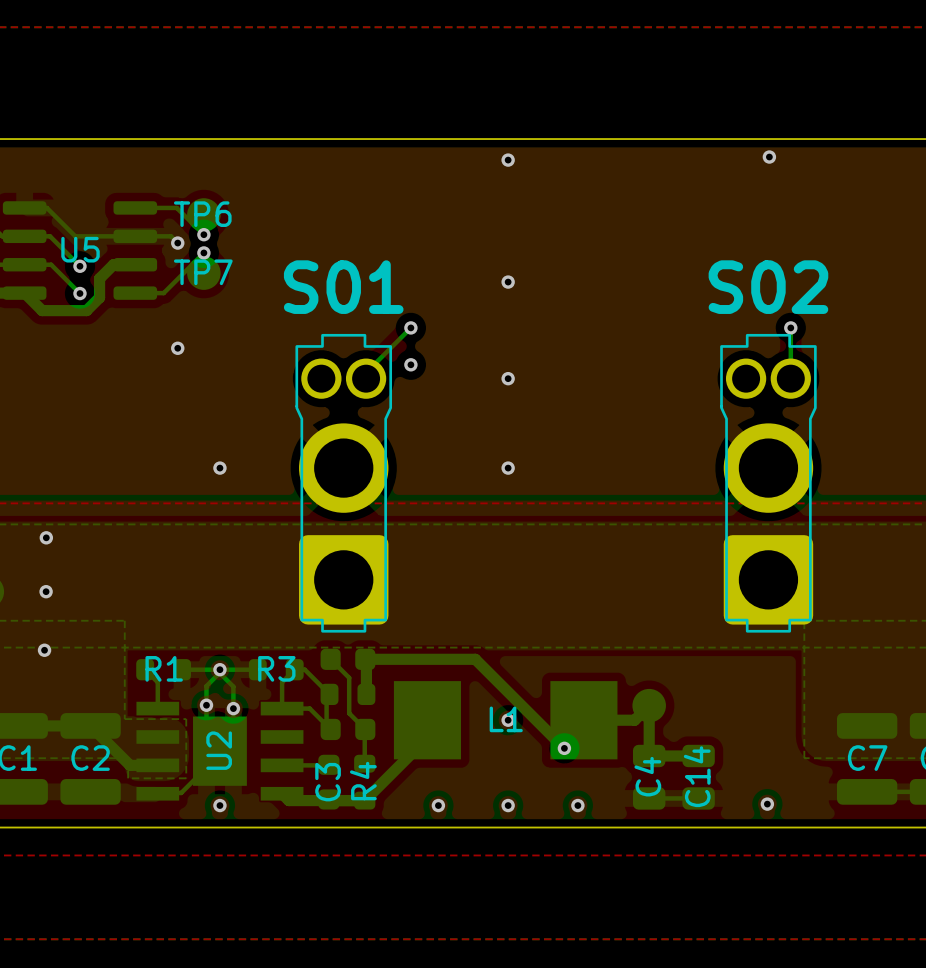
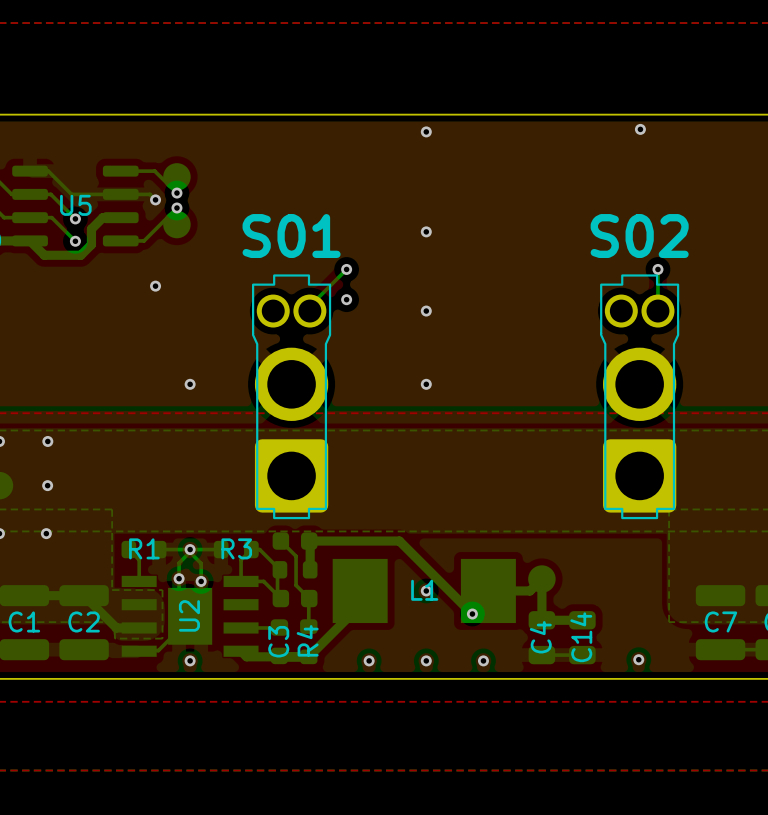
TP6 name: TP6 (202, 214) -> none
TP7 name: TP7 (203, 272) -> none

